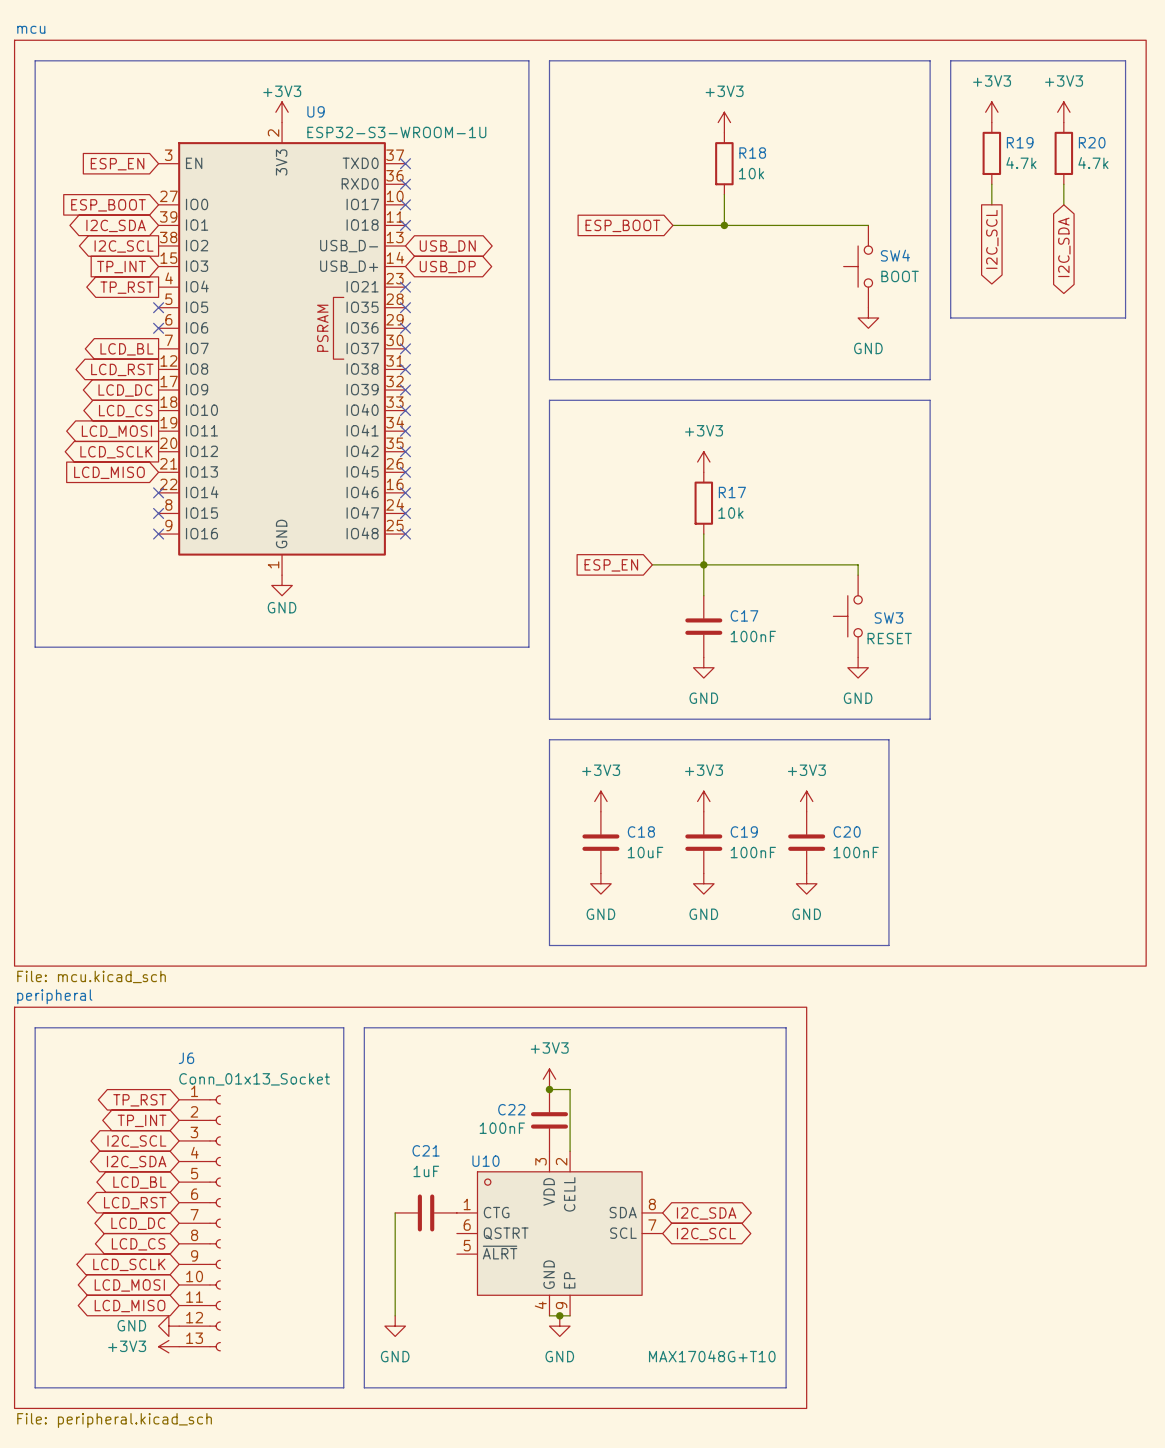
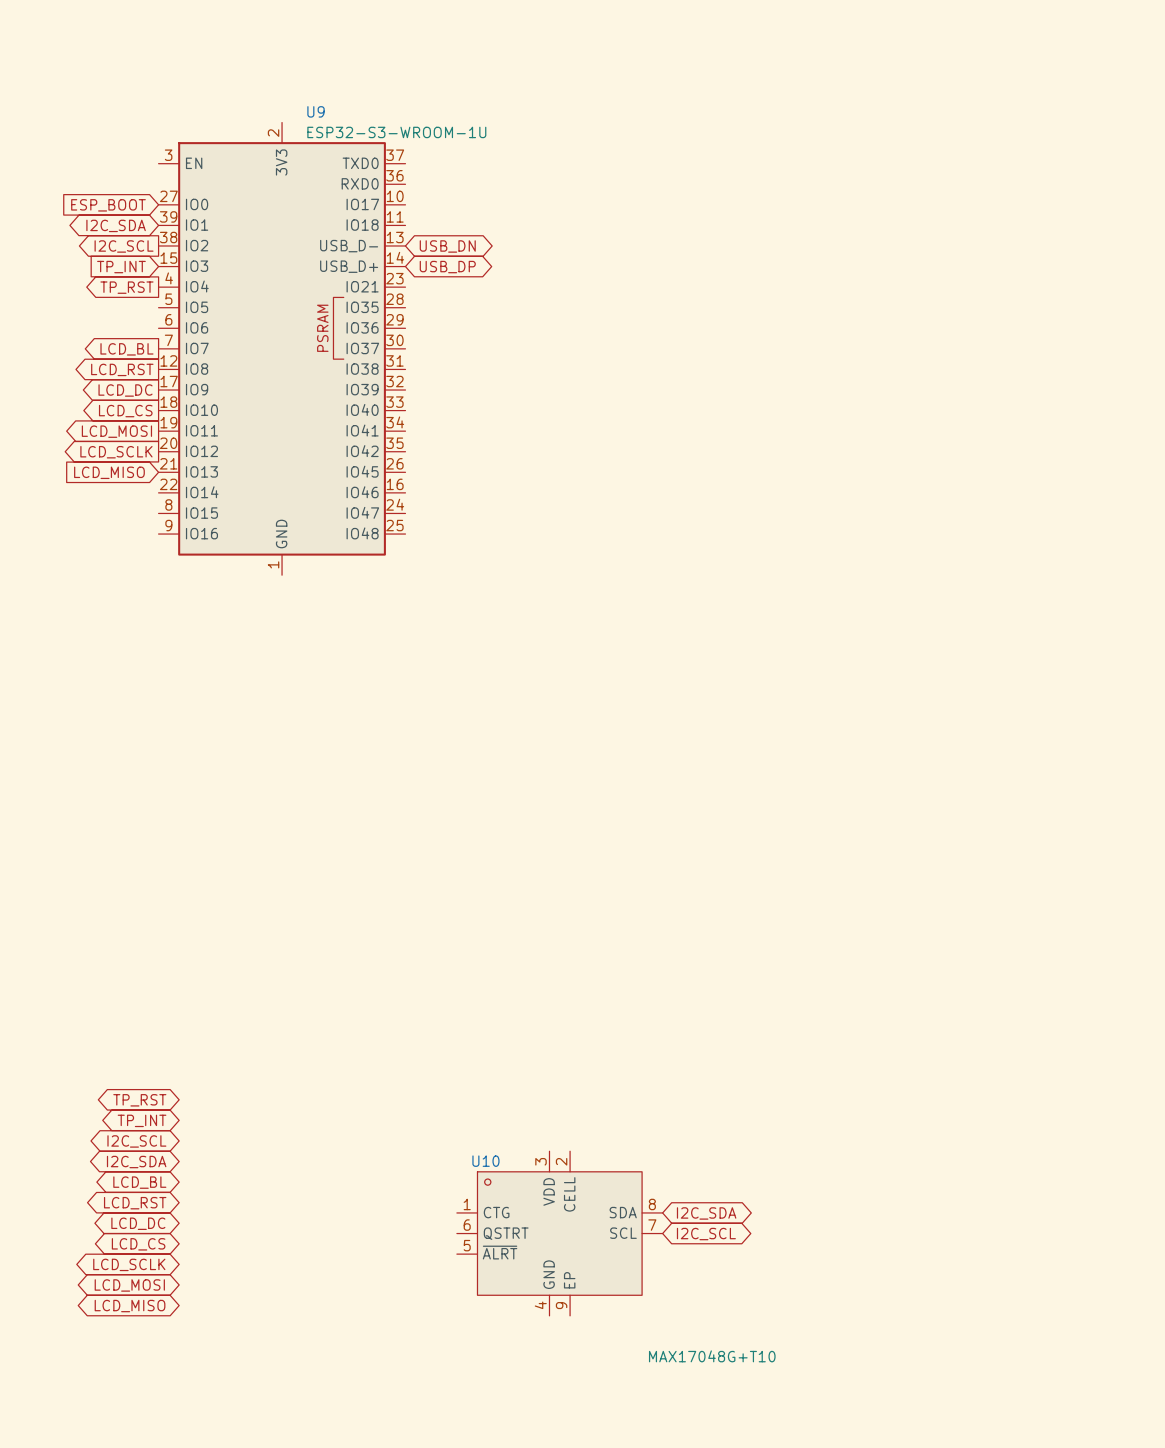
line: (35, 60) (528, 60) (528, 647) (35, 647) (35, 60) -> none
line: (549, 60) (930, 60) (930, 379) (549, 379) (549, 60) -> none
line: (950, 60) (1125, 60) (1125, 318) (950, 318) (950, 60) -> none
power symbol: +3V3 (282, 112) -> none
power symbol: +3V3 (991, 112) -> none
power symbol: +3V3 (1063, 112) -> none
power symbol: +3V3 (724, 122) -> none
R19: 4.7k (991, 153) -> none
R20: 4.7k (1063, 153) -> none
no-connect mark: (405, 163) -> none
R18: 10k (724, 163) -> none
global label: ESP_EN (117, 164) -> none
no-connect mark: (405, 184) -> none
wire: (991, 184) (991, 204) -> none
wire: (1063, 184) (1063, 204) -> none
wire: (724, 194) (724, 225) -> none
no-connect mark: (405, 204) -> none
no-connect mark: (405, 225) -> none
global label: ESP_BOOT (622, 225) -> none
wire: (672, 225) (868, 225) -> none
junction: (724, 225) -> none
global label: I2C_SCL (992, 239) -> none
global label: I2C_SDA (1064, 247) -> none
SW4: BOOT (858, 266) -> none
no-connect mark: (405, 287) -> none
no-connect mark: (158, 307) -> none
no-connect mark: (405, 307) -> none
power symbol: GND (868, 318) -> none
no-connect mark: (158, 328) -> none
no-connect mark: (405, 328) -> none
no-connect mark: (405, 348) -> none
no-connect mark: (405, 369) -> none
no-connect mark: (405, 390) -> none
line: (549, 400) (549, 719) (930, 719) (930, 400) (549, 400) -> none
no-connect mark: (405, 410) -> none
no-connect mark: (405, 431) -> none
no-connect mark: (405, 451) -> none
power symbol: +3V3 (703, 462) -> none
no-connect mark: (405, 472) -> none
no-connect mark: (158, 492) -> none
no-connect mark: (405, 492) -> none
sheet mcu: File: mcu.kicad_sch (580, 503) -> none
R17: 10k (703, 503) -> none
no-connect mark: (158, 513) -> none
no-connect mark: (405, 513) -> none
no-connect mark: (158, 534) -> none
no-connect mark: (405, 534) -> none
wire: (703, 534) (703, 595) -> none
wire: (652, 564) (858, 564) (858, 575) -> none
junction: (703, 564) -> none
global label: ESP_EN (611, 565) -> none
power symbol: GND (282, 585) -> none
SW3: RESET (847, 616) -> none
C17: 100nF (703, 626) -> none
power symbol: GND (703, 667) -> none
power symbol: GND (858, 667) -> none
line: (549, 739) (888, 739) (888, 945) (549, 945) (549, 739) -> none
power symbol: +3V3 (600, 801) -> none
power symbol: +3V3 (703, 801) -> none
power symbol: +3V3 (806, 801) -> none
C18: 10uF (600, 842) -> none
C19: 100nF (703, 842) -> none
C20: 100nF (806, 842) -> none
power symbol: GND (600, 883) -> none
power symbol: GND (703, 883) -> none
power symbol: GND (806, 883) -> none
line: (35, 1027) (35, 1387) (343, 1387) (343, 1027) (35, 1027) -> none
line: (364, 1027) (786, 1027) (786, 1387) (364, 1387) (364, 1027) -> none
power symbol: +3V3 (549, 1079) -> none
wire: (549, 1089) (570, 1089) (570, 1151) -> none
junction: (549, 1089) -> none
C22: 100nF (549, 1120) -> none
sheet peripheral: File: peripheral.kicad_sch (410, 1207) -> none
wire: (395, 1212) (395, 1315) -> none
C21: 1uF (426, 1212) -> none
J6: Conn_01x13_Socket (200, 1223) -> none
wire: (549, 1315) (570, 1315) -> none
junction: (559, 1315) -> none
power symbol: GND (168, 1326) -> none
power symbol: GND (395, 1326) -> none
power symbol: GND (559, 1326) -> none
power symbol: +3V3 (168, 1346) -> none

